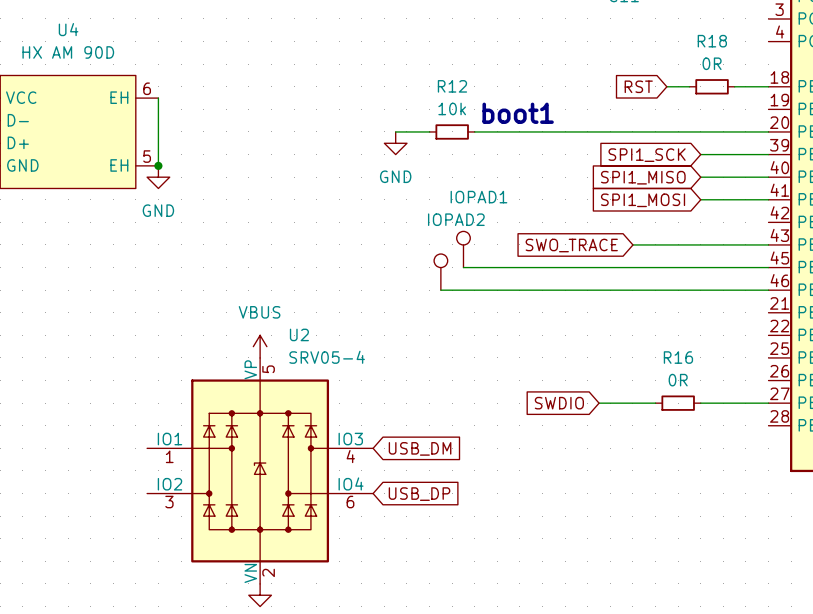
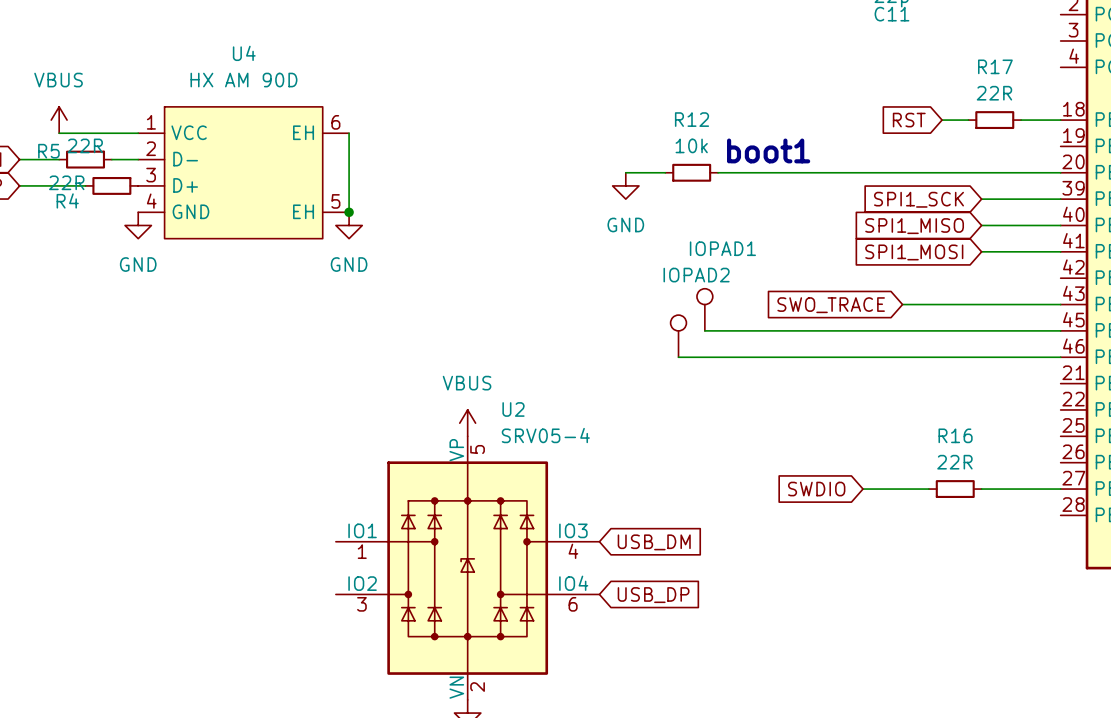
R18 name: R18 (712, 41) -> R17 (995, 66)
R18 value: 0R (712, 63) -> 22R (994, 93)
R16 value: 0R (678, 380) -> 22R (954, 462)

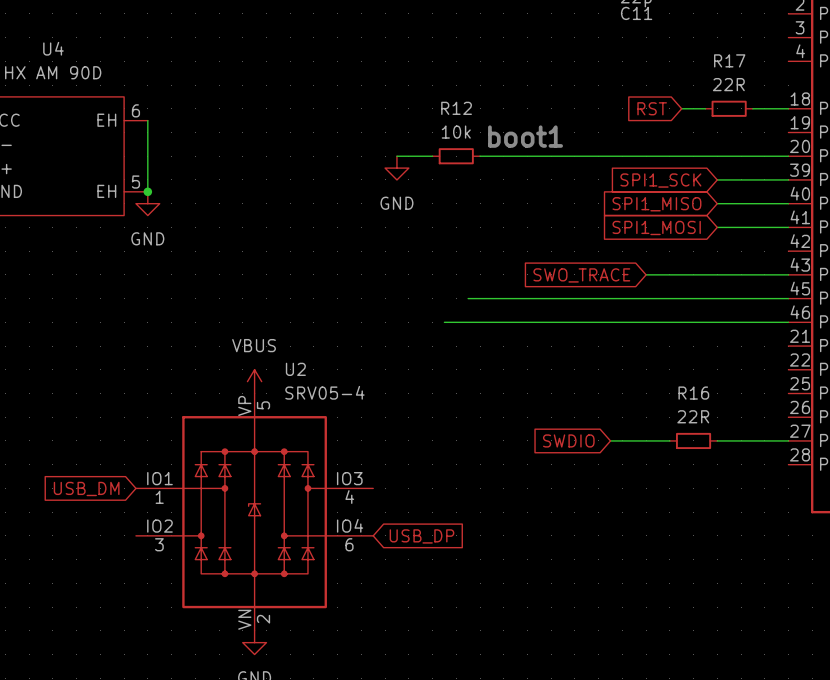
part: IOPAD1 (704, 309) -> none
part: IOPAD2 (678, 336) -> none
global label: none -> USB_DM (86, 488)
global label: USB_DM (654, 542) -> none

